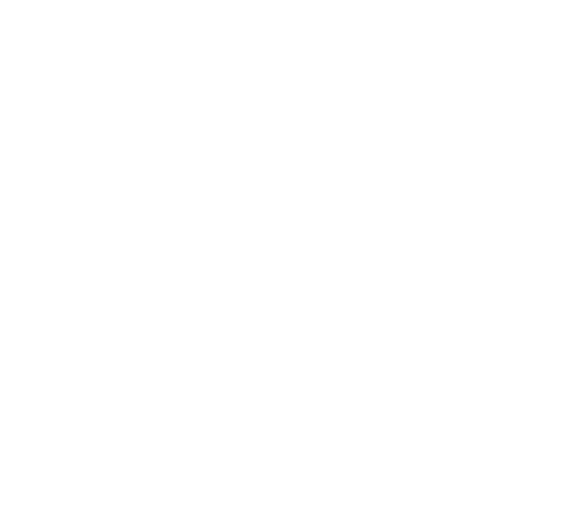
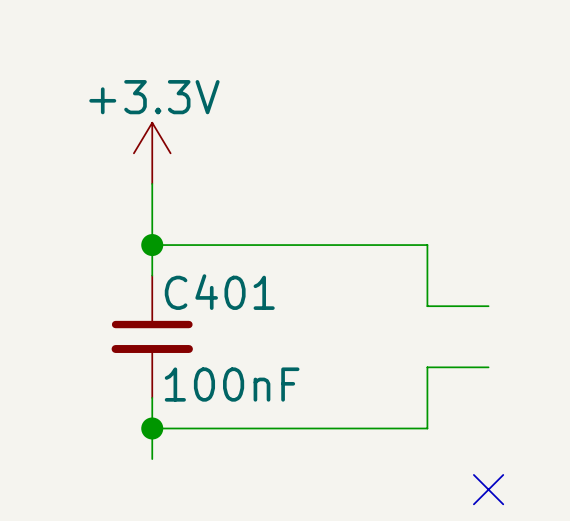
power symbol: none -> +3.3V (152, 153)
wire: none -> (152, 183) (152, 275)
wire: none -> (152, 245) (427, 245) (427, 306) (488, 306)
junction: none -> (152, 245)
C401: none -> 100nF (152, 336)
wire: none -> (488, 367) (427, 367) (427, 428) (152, 428)
wire: none -> (152, 397) (152, 459)
junction: none -> (152, 428)
no-connect mark: none -> (488, 489)

